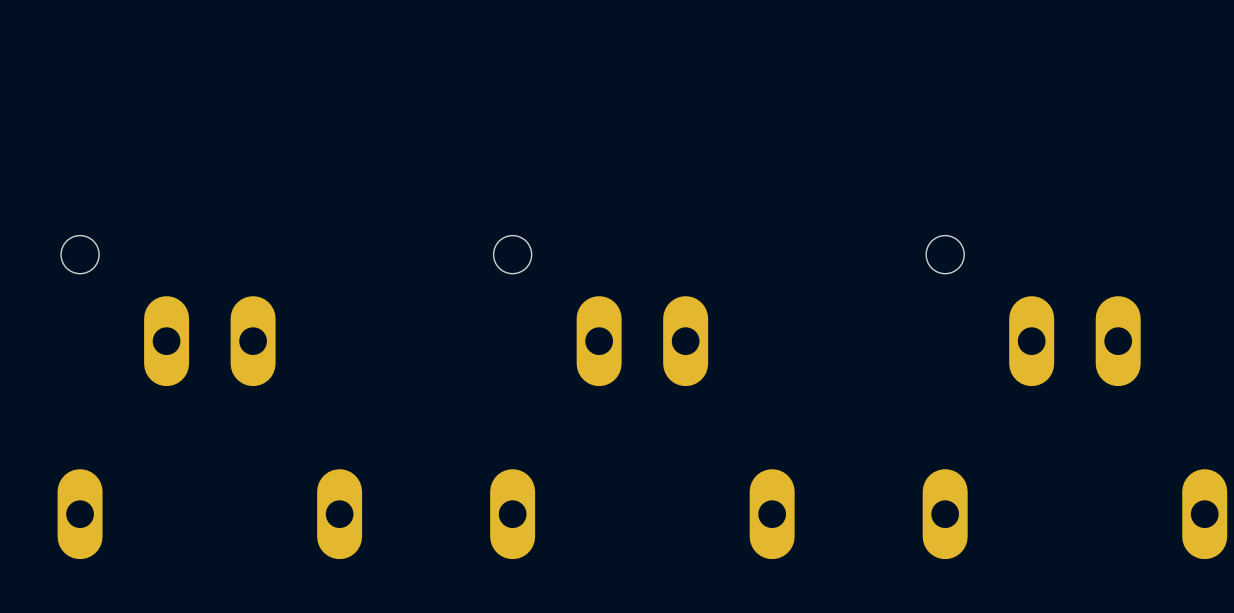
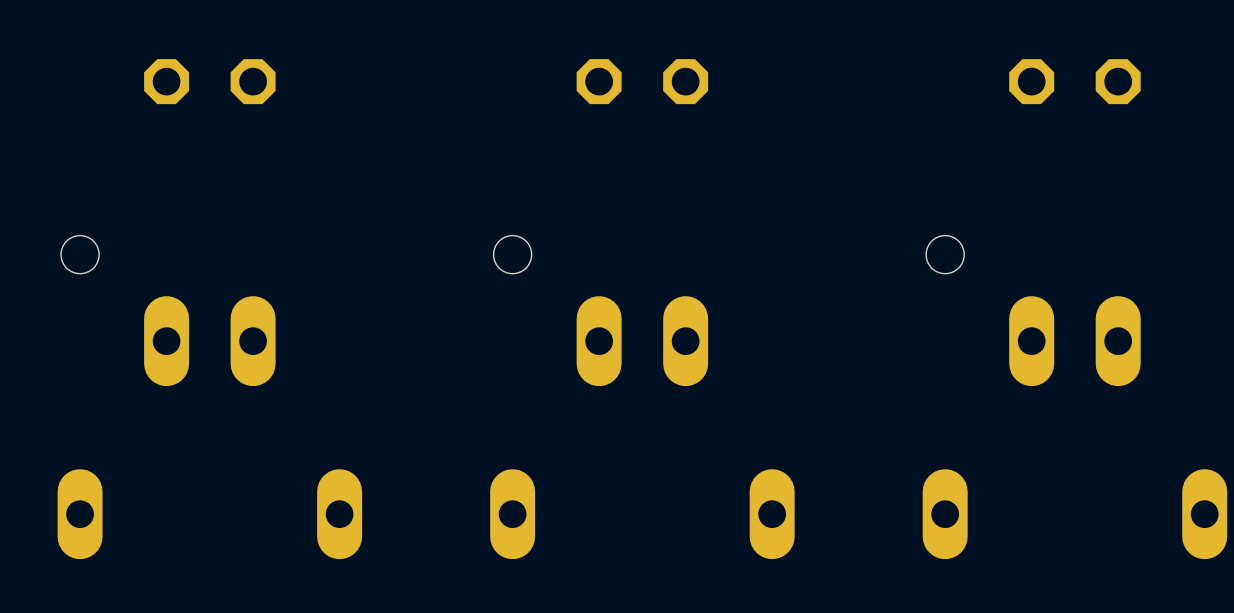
part: none -> (209, 81)
part: none -> (642, 81)
part: none -> (1074, 81)

